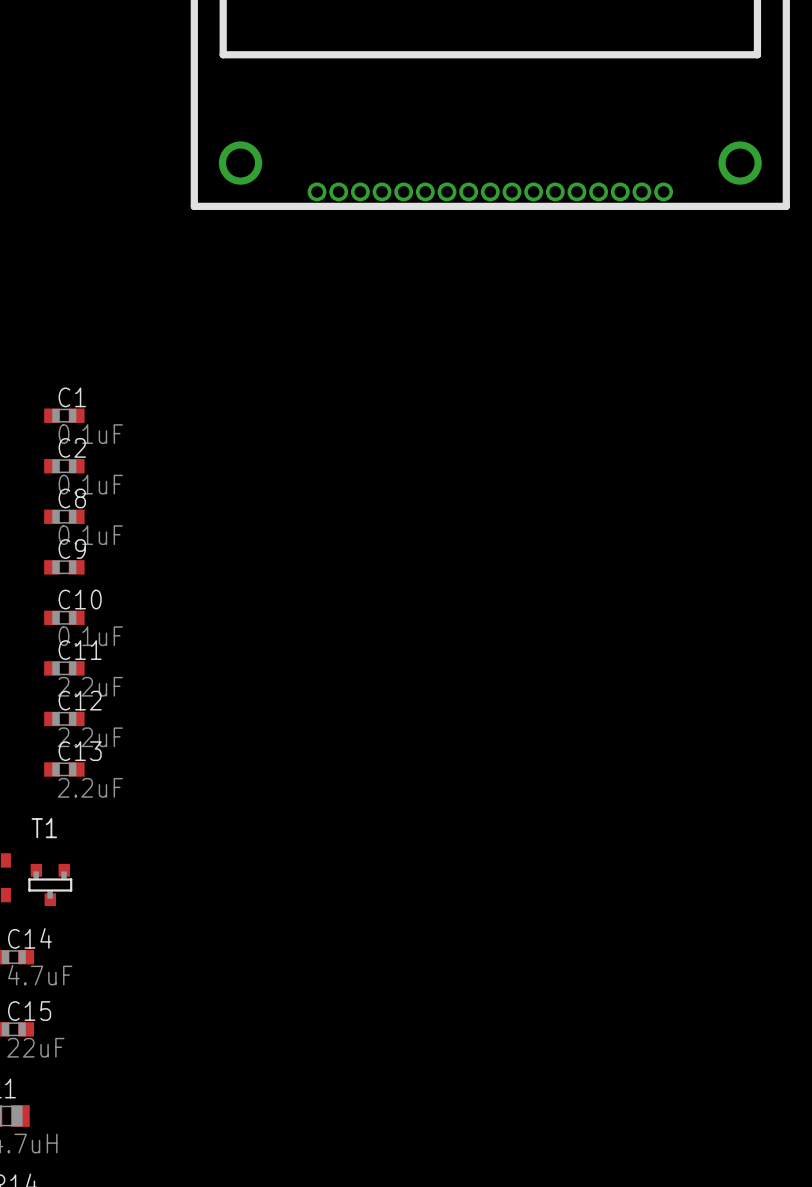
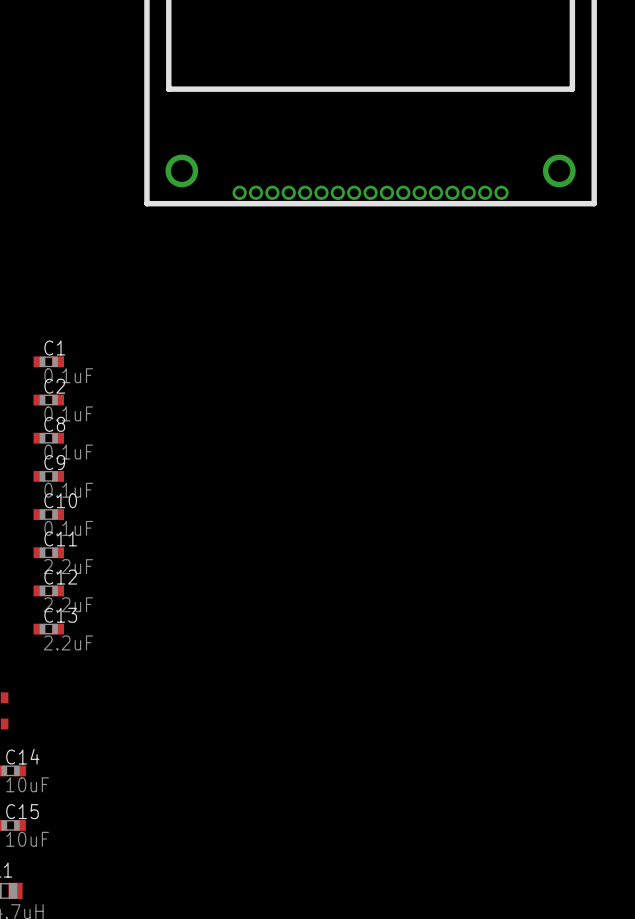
C9 value: none -> 0.1uF (68, 490)
T1: (50, 884) -> none
C14 value: 4.7uF (40, 975) -> 10uF (27, 784)
C15 value: 22uF (35, 1047) -> 10uF (27, 839)

